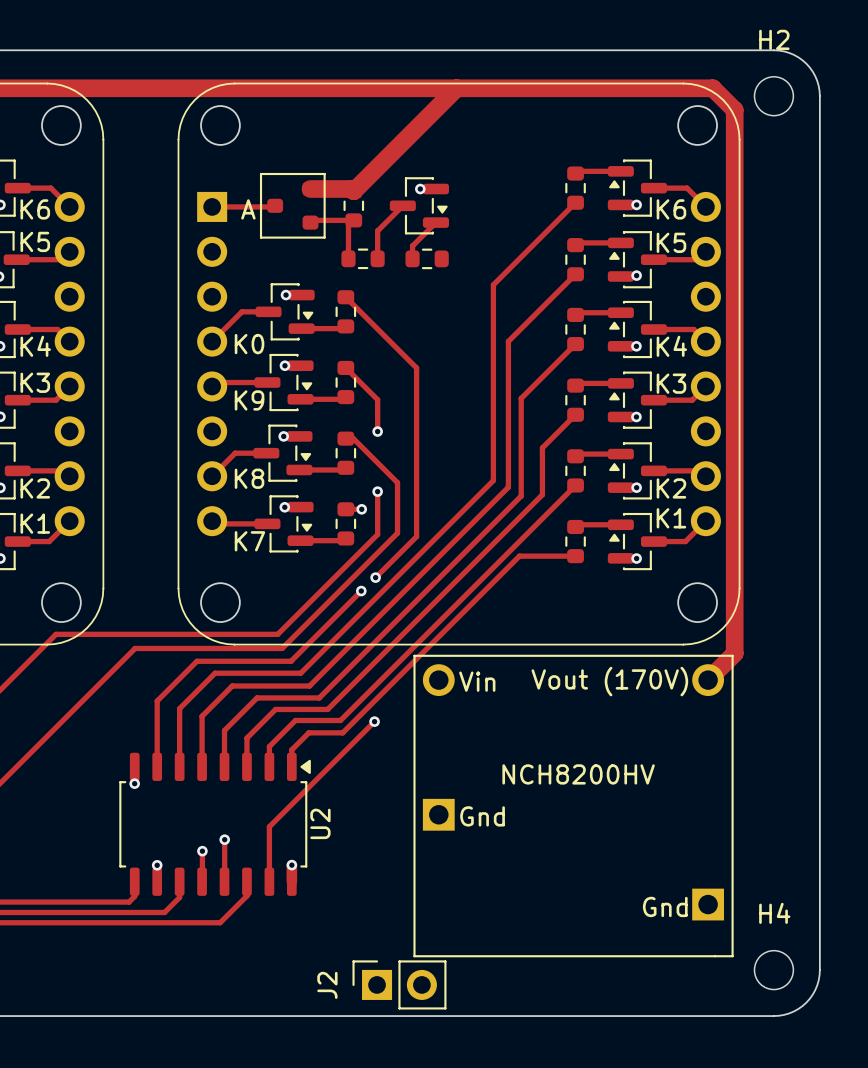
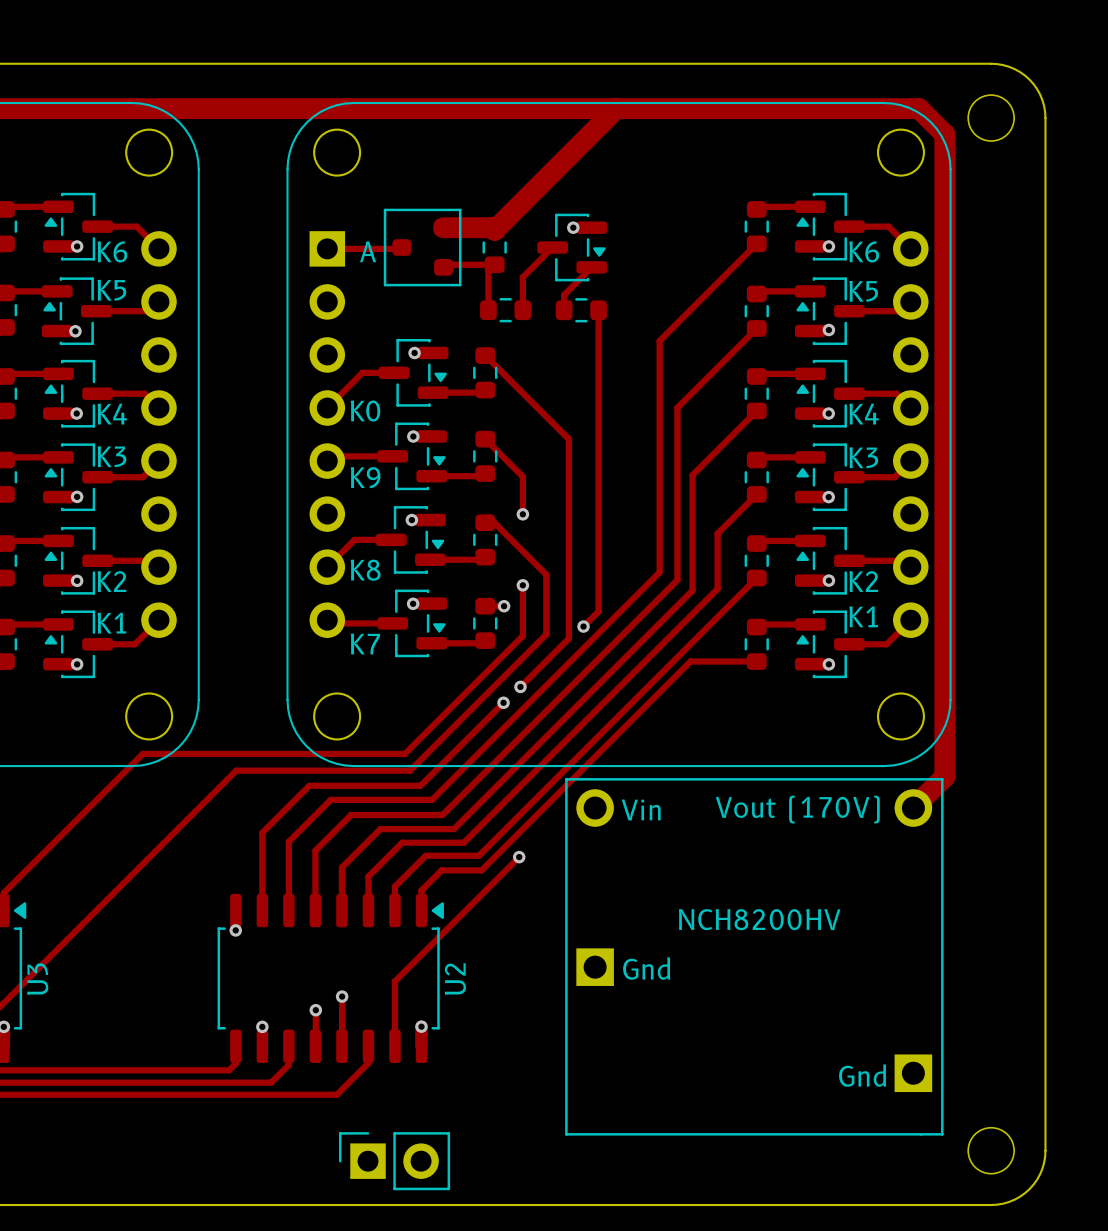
H2 name: H2 (774, 39) -> none
track: none -> (598, 310) (598, 611) (583, 626)
via: none -> (583, 626)
H4 name: H4 (774, 913) -> none
part: none -> (394, 1161)
J2: (399, 984) -> none

